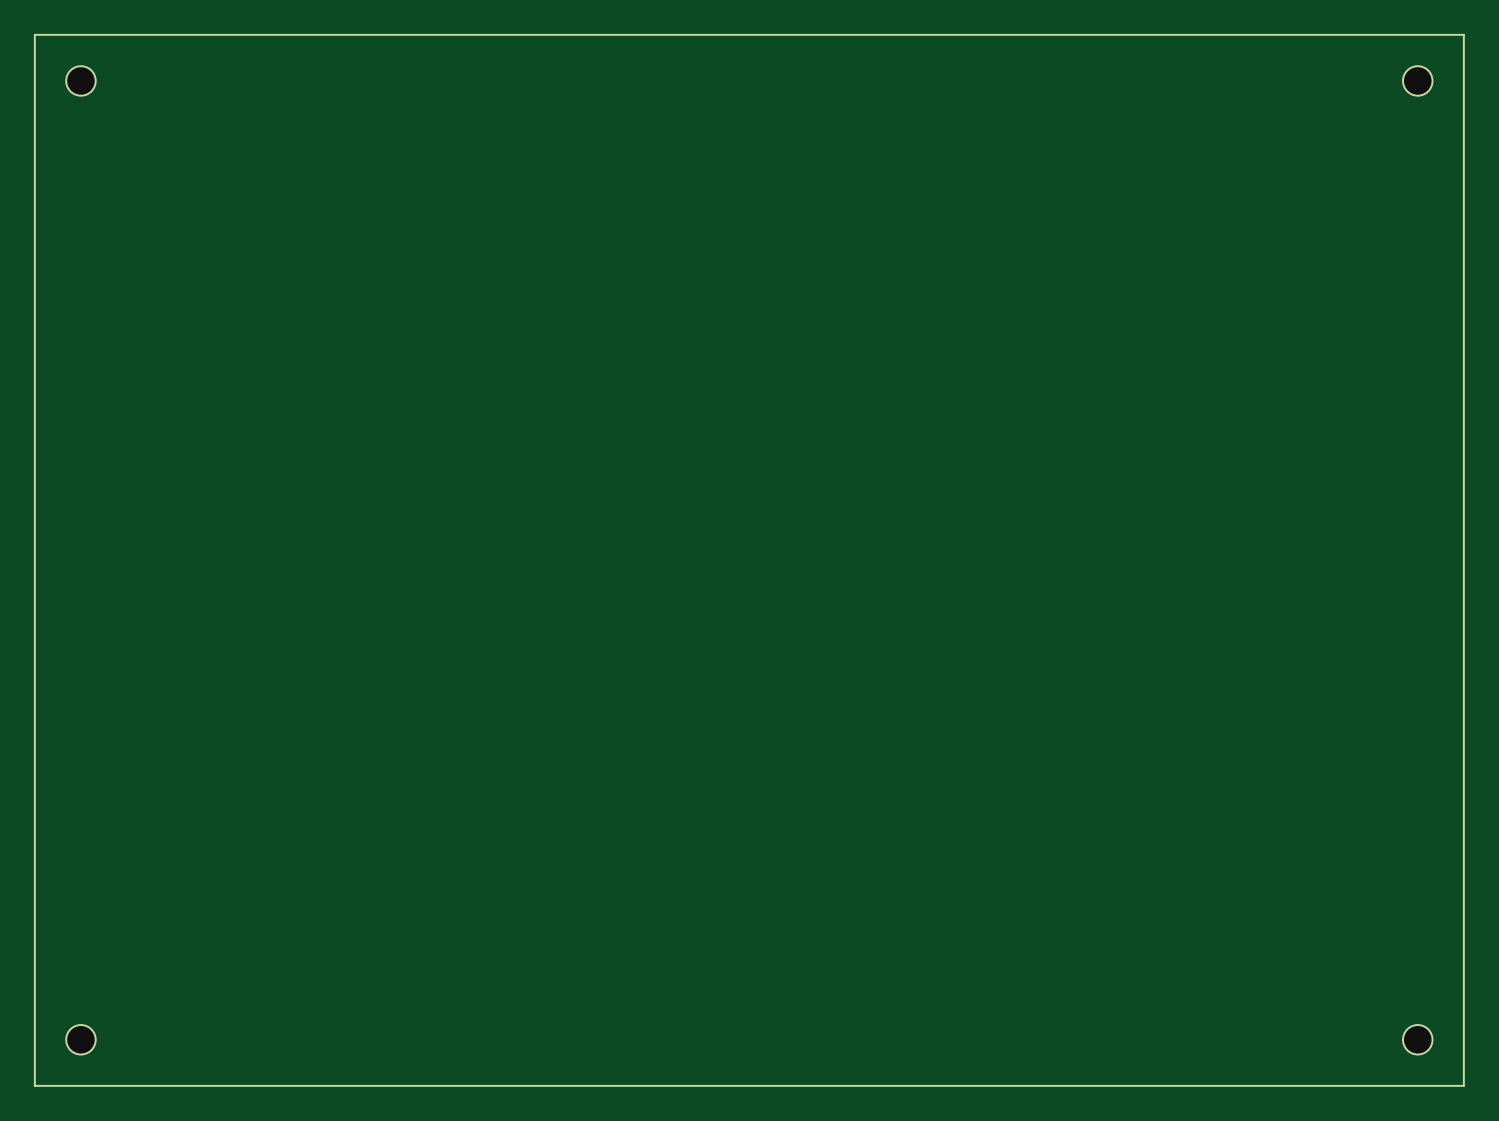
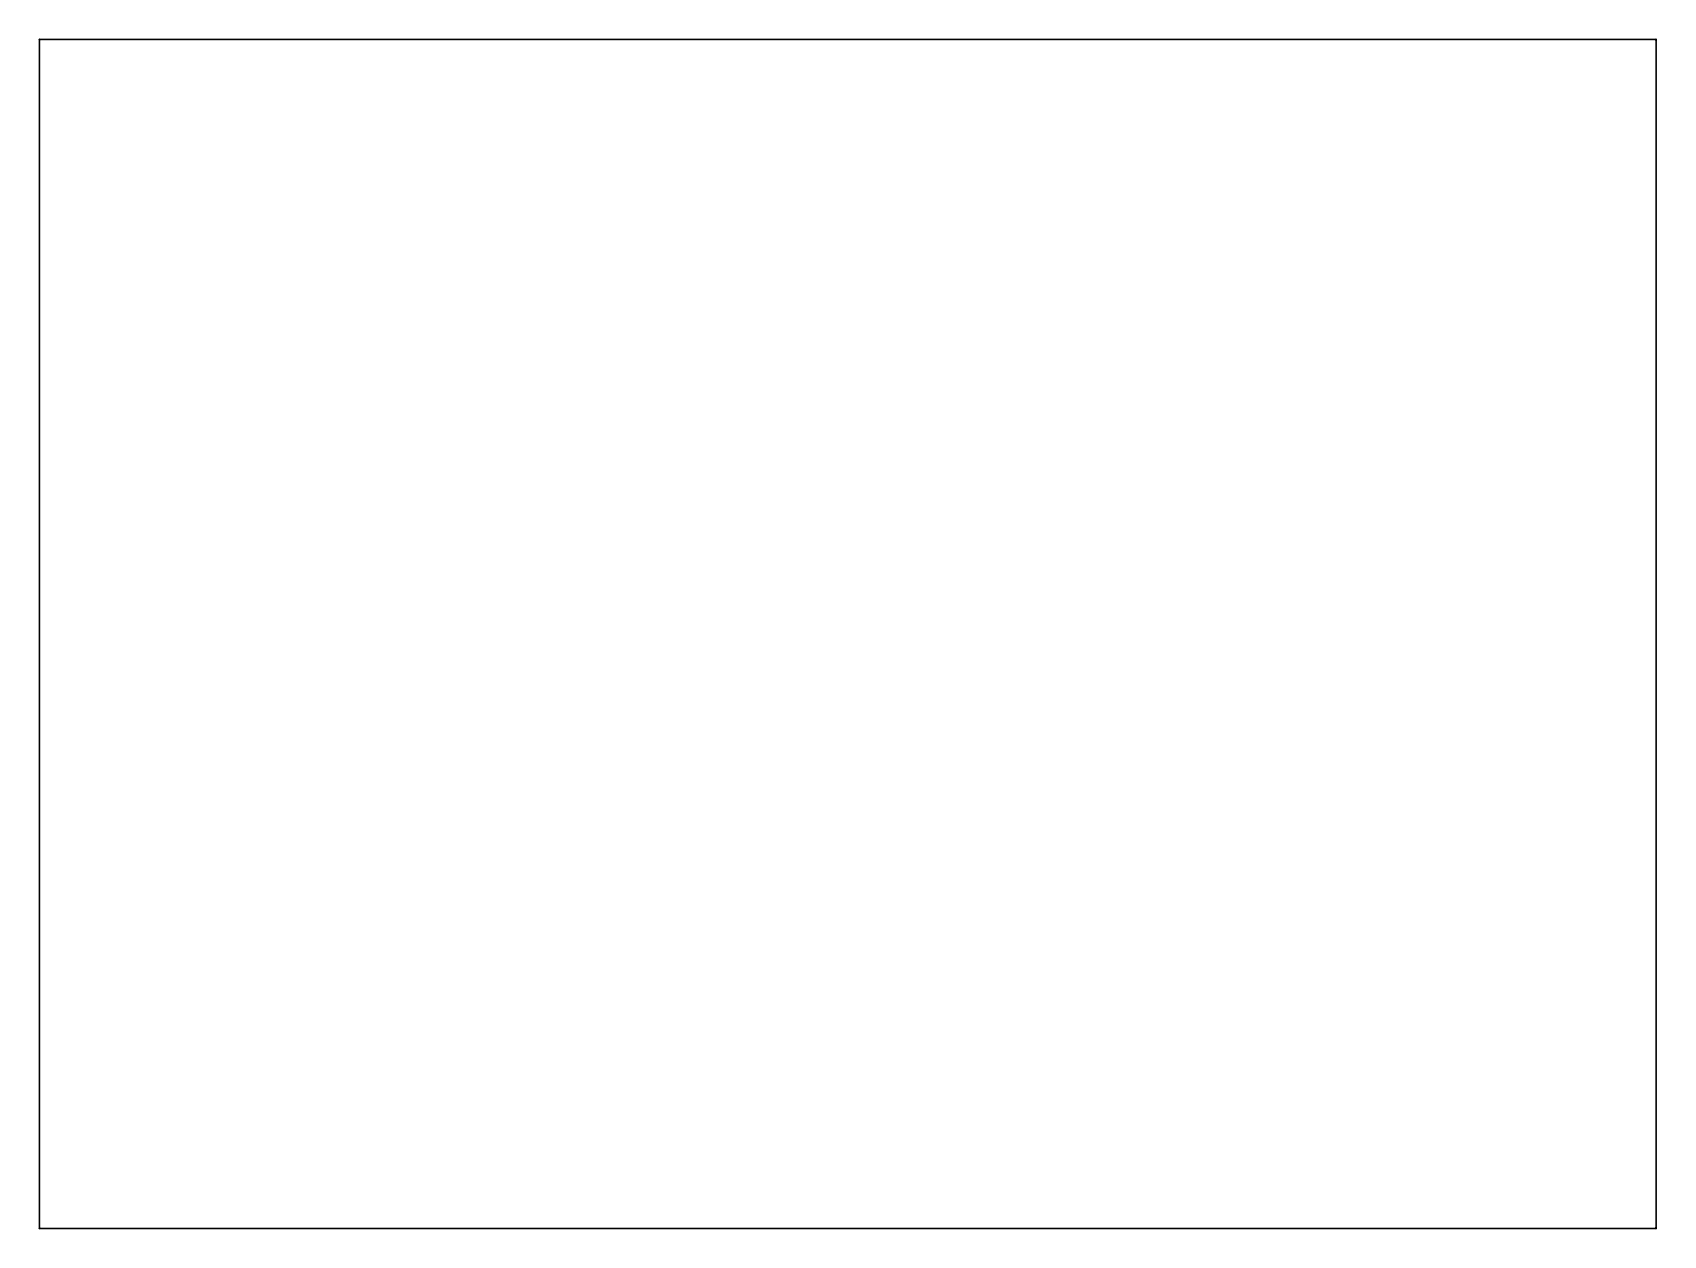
hole: (80, 80) -> none
hole: (1417, 80) -> none
hole: (80, 1039) -> none
hole: (1417, 1039) -> none

